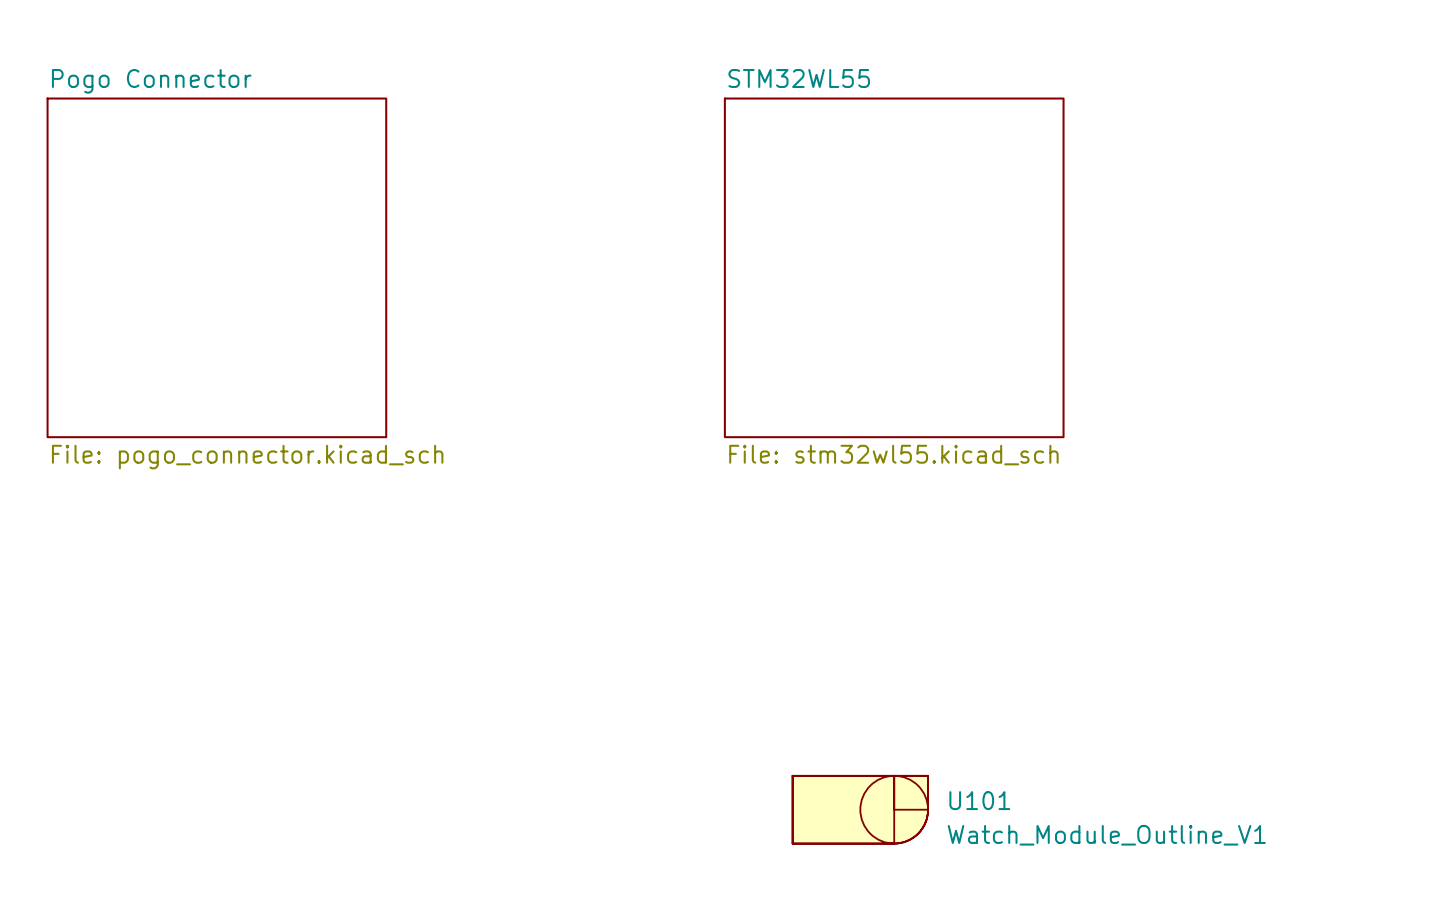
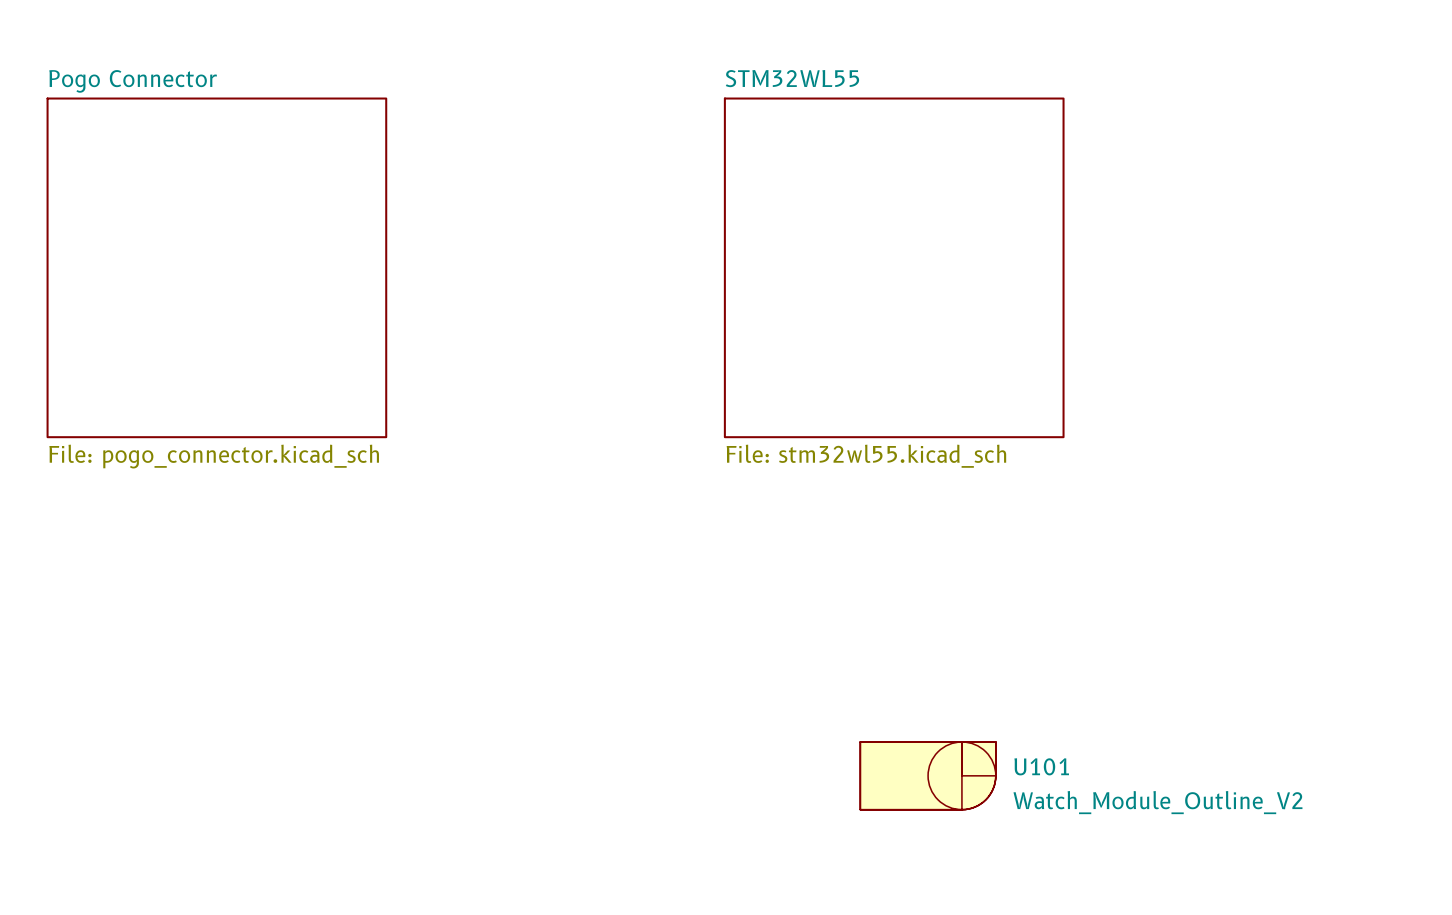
U101 position: (860, 809) -> (928, 775)
U101 value: Watch_Module_Outline_V1 (1106, 835) -> Watch_Module_Outline_V2 (1157, 802)

